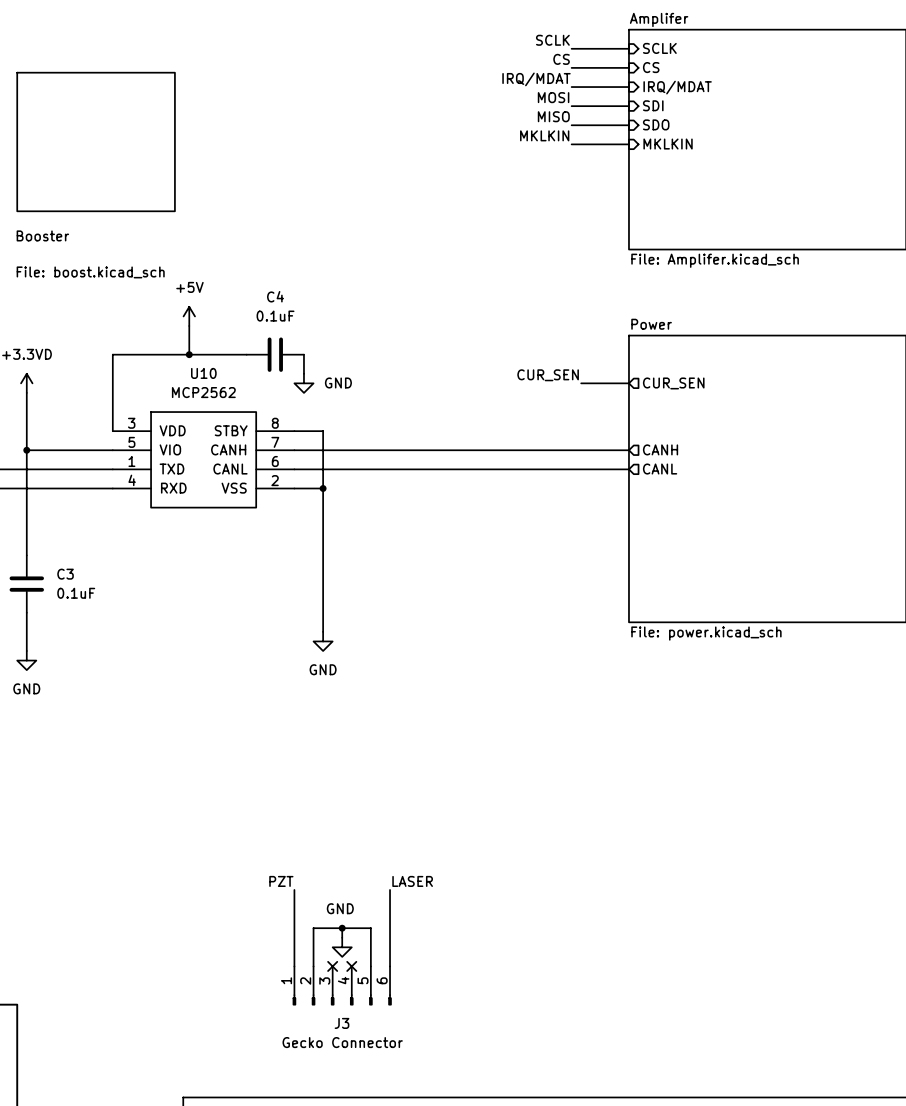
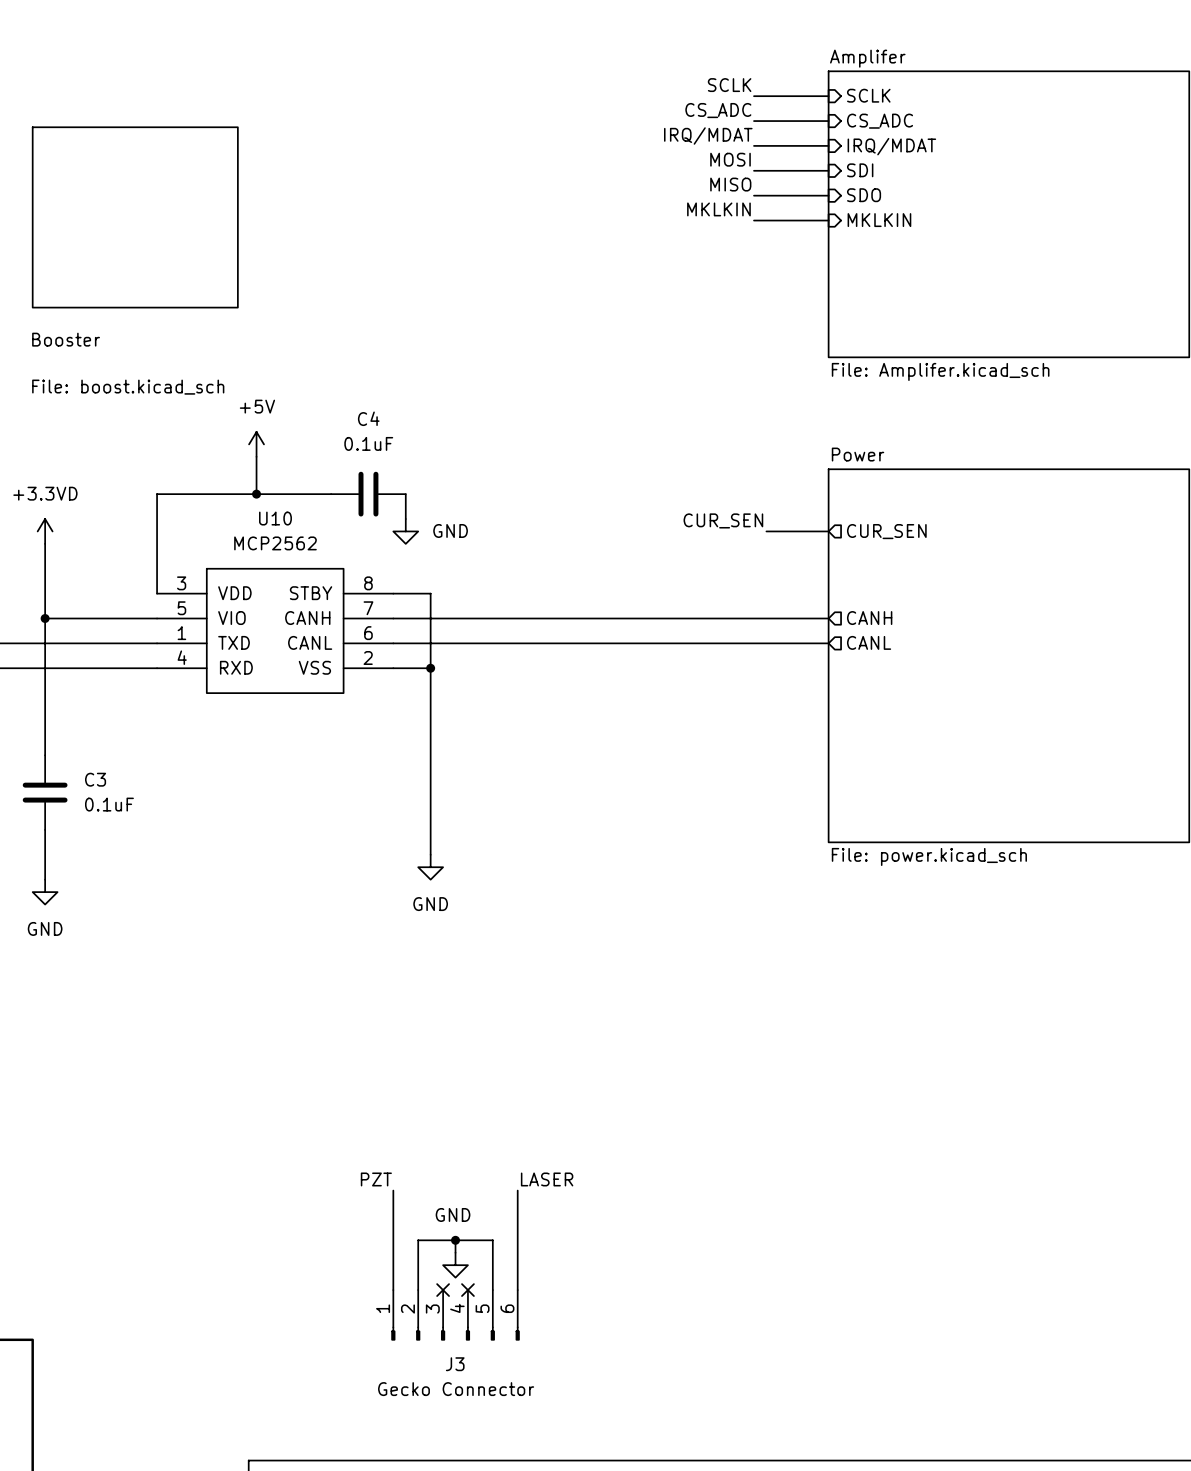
label: CS (561, 59) -> CS_ADC (718, 110)
sheet pin: CS (651, 67) -> CS_ADC (880, 121)

